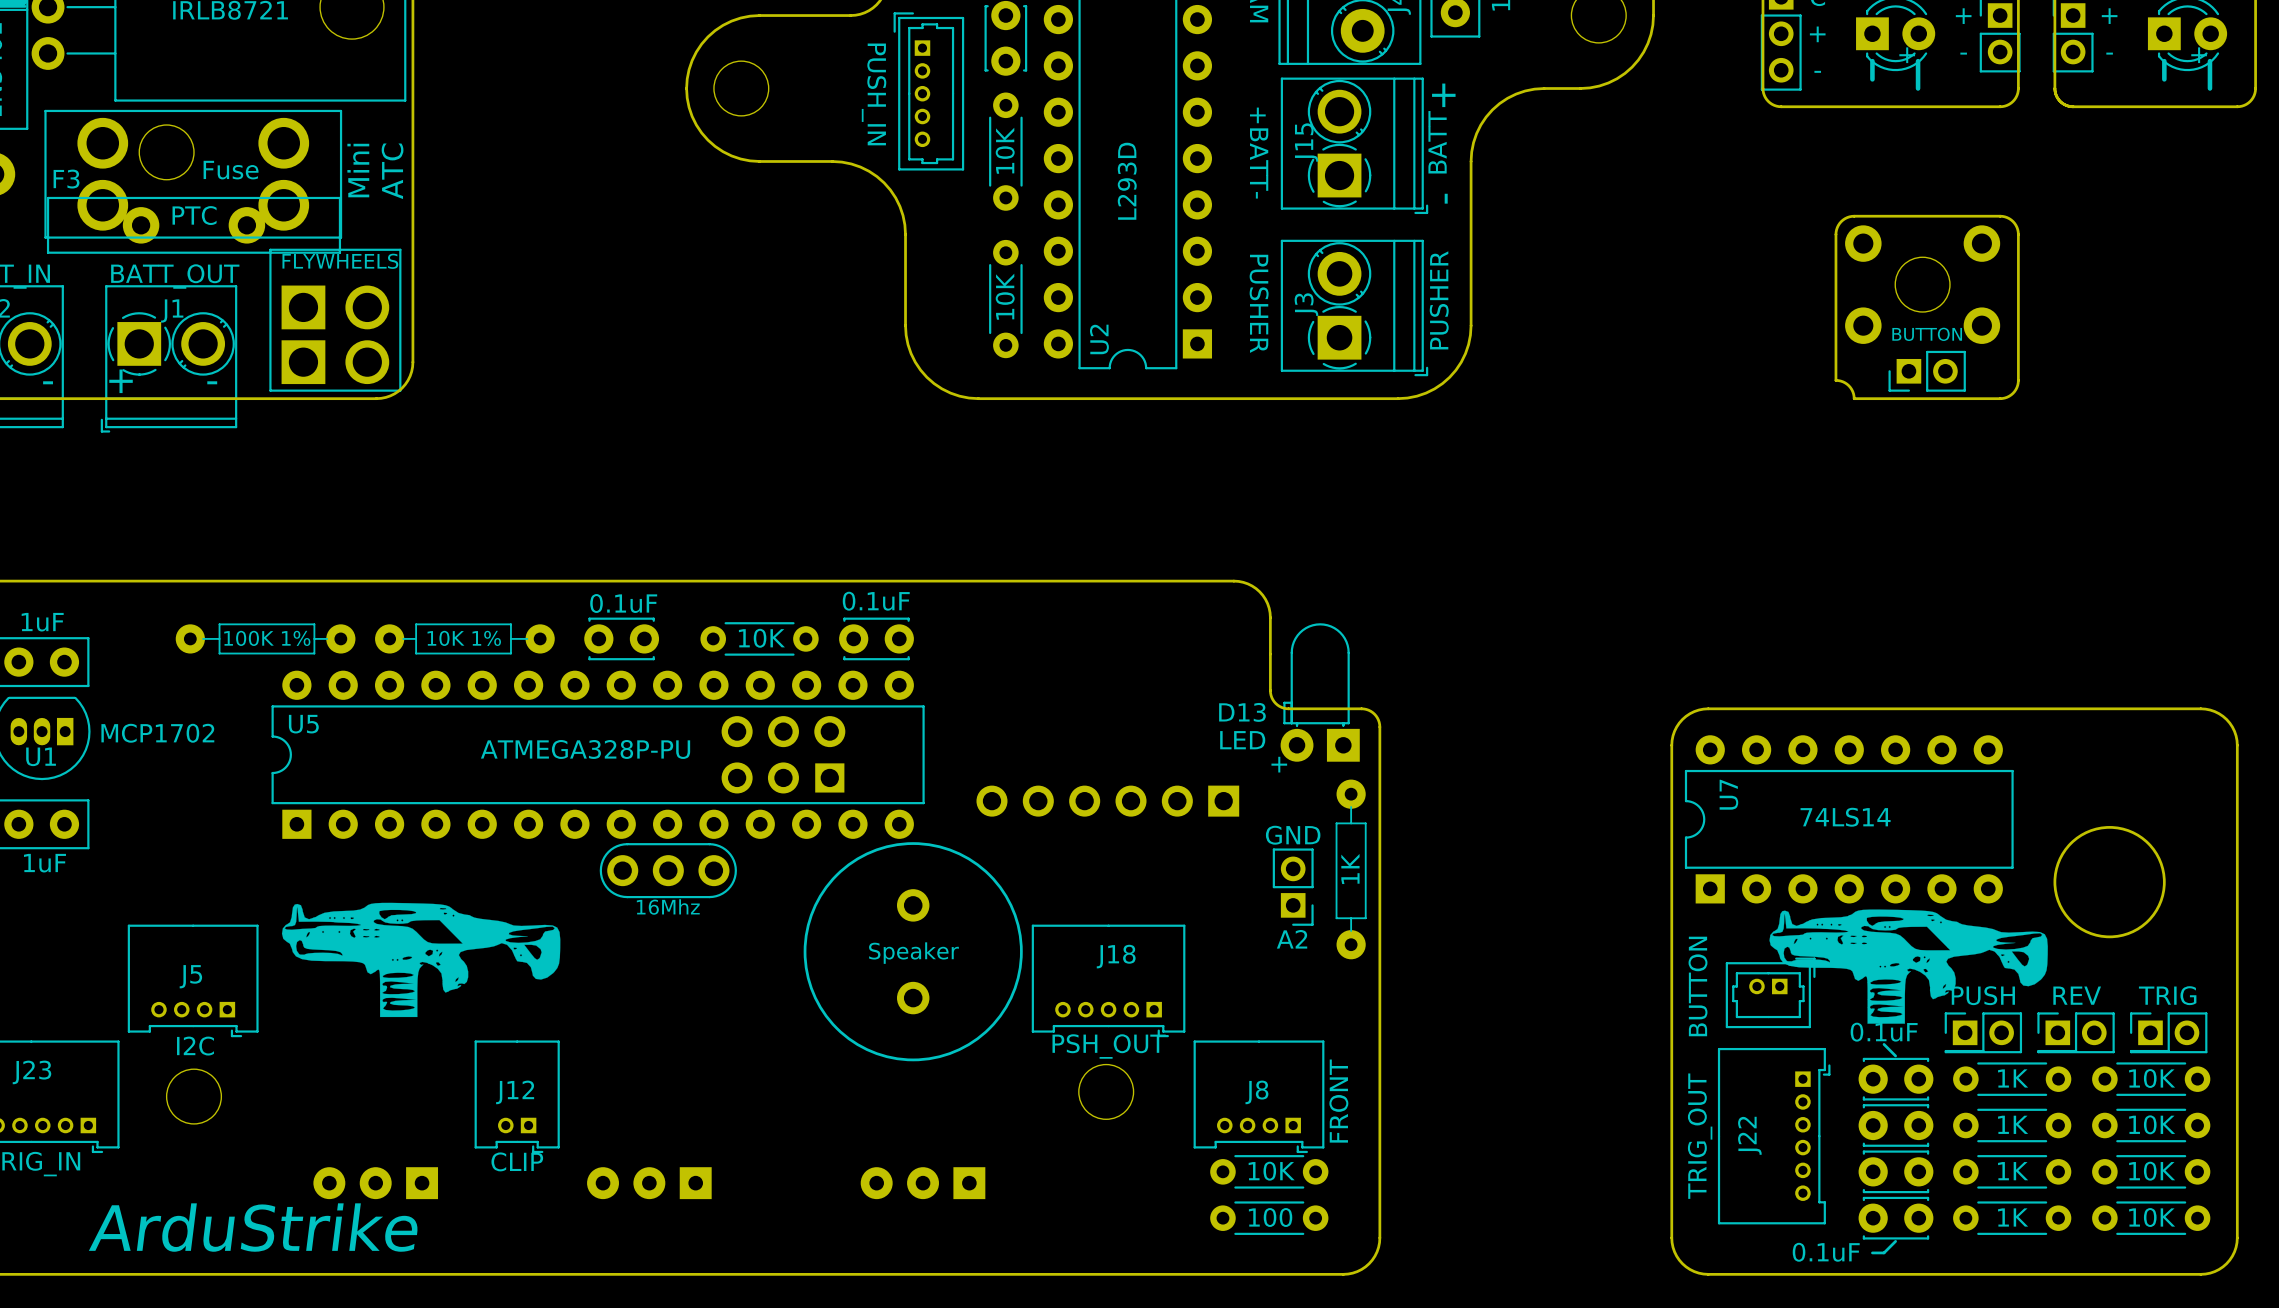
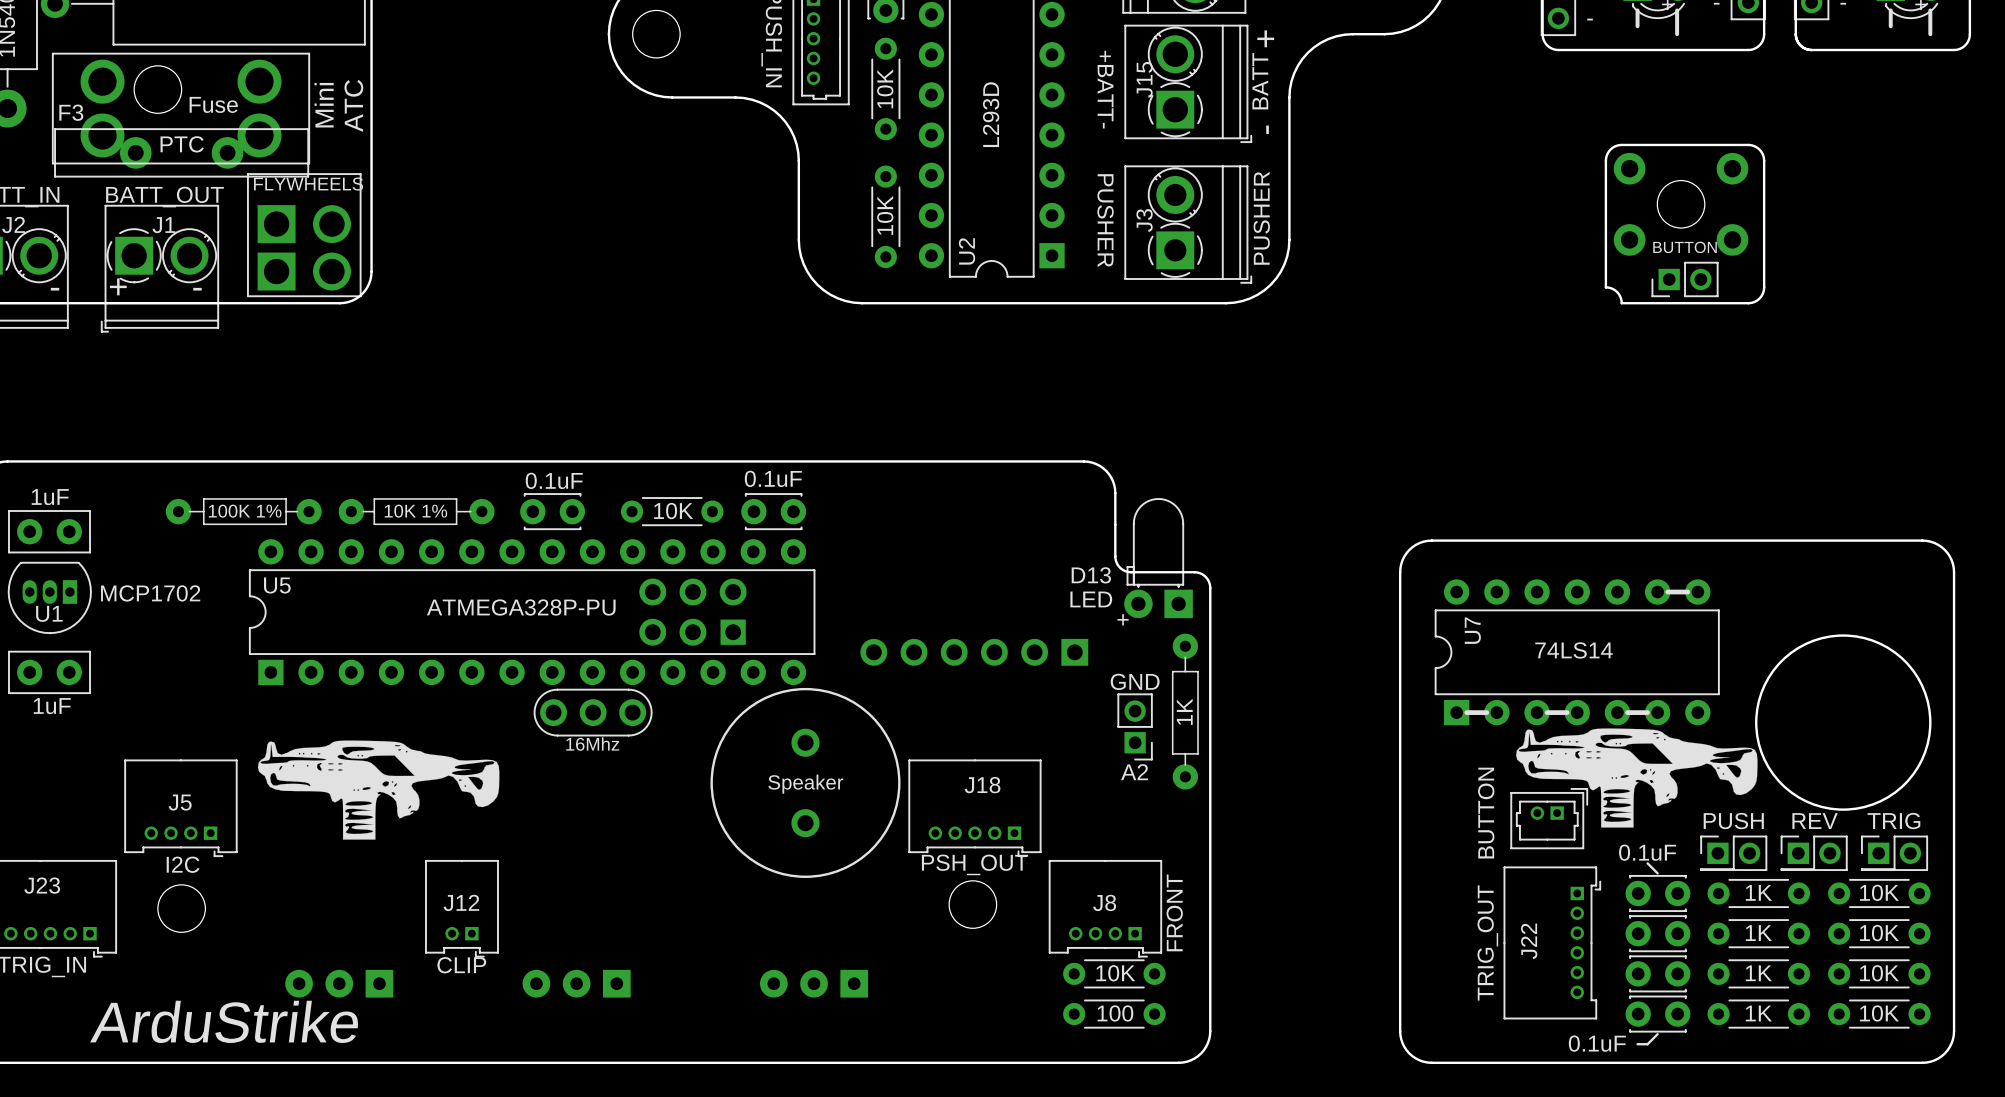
line: none -> (1667, 592) (1687, 592)
board edge: (2237, 745) (2234, 731) (2226, 719) (2214, 711) (2200, 708) (1708, 708) (1694, 711) (1682, 719) (1674, 731) (1671, 745) (1671, 1237) (1674, 1251) (1682, 1263) (1694, 1271) (1708, 1274) -> (1954, 603) (1954, 572) (1951, 560) (1941, 547) (1926, 540) (1431, 540) (1419, 542) (1409, 549) (1402, 560) (1400, 572) (1400, 1035) (1402, 1043) (1409, 1053) (1423, 1061) (1495, 1062)
U7 position: (1849, 819) -> (1577, 652)
round board edge size: [2053, 826, 2166, 939] -> [1755, 634, 1932, 811]
line: none -> (1466, 712) (1486, 712)
line: none -> (1547, 712) (1567, 712)
line: none -> (1627, 712) (1647, 712)
drawing position: (1908, 966) -> (1636, 778)

